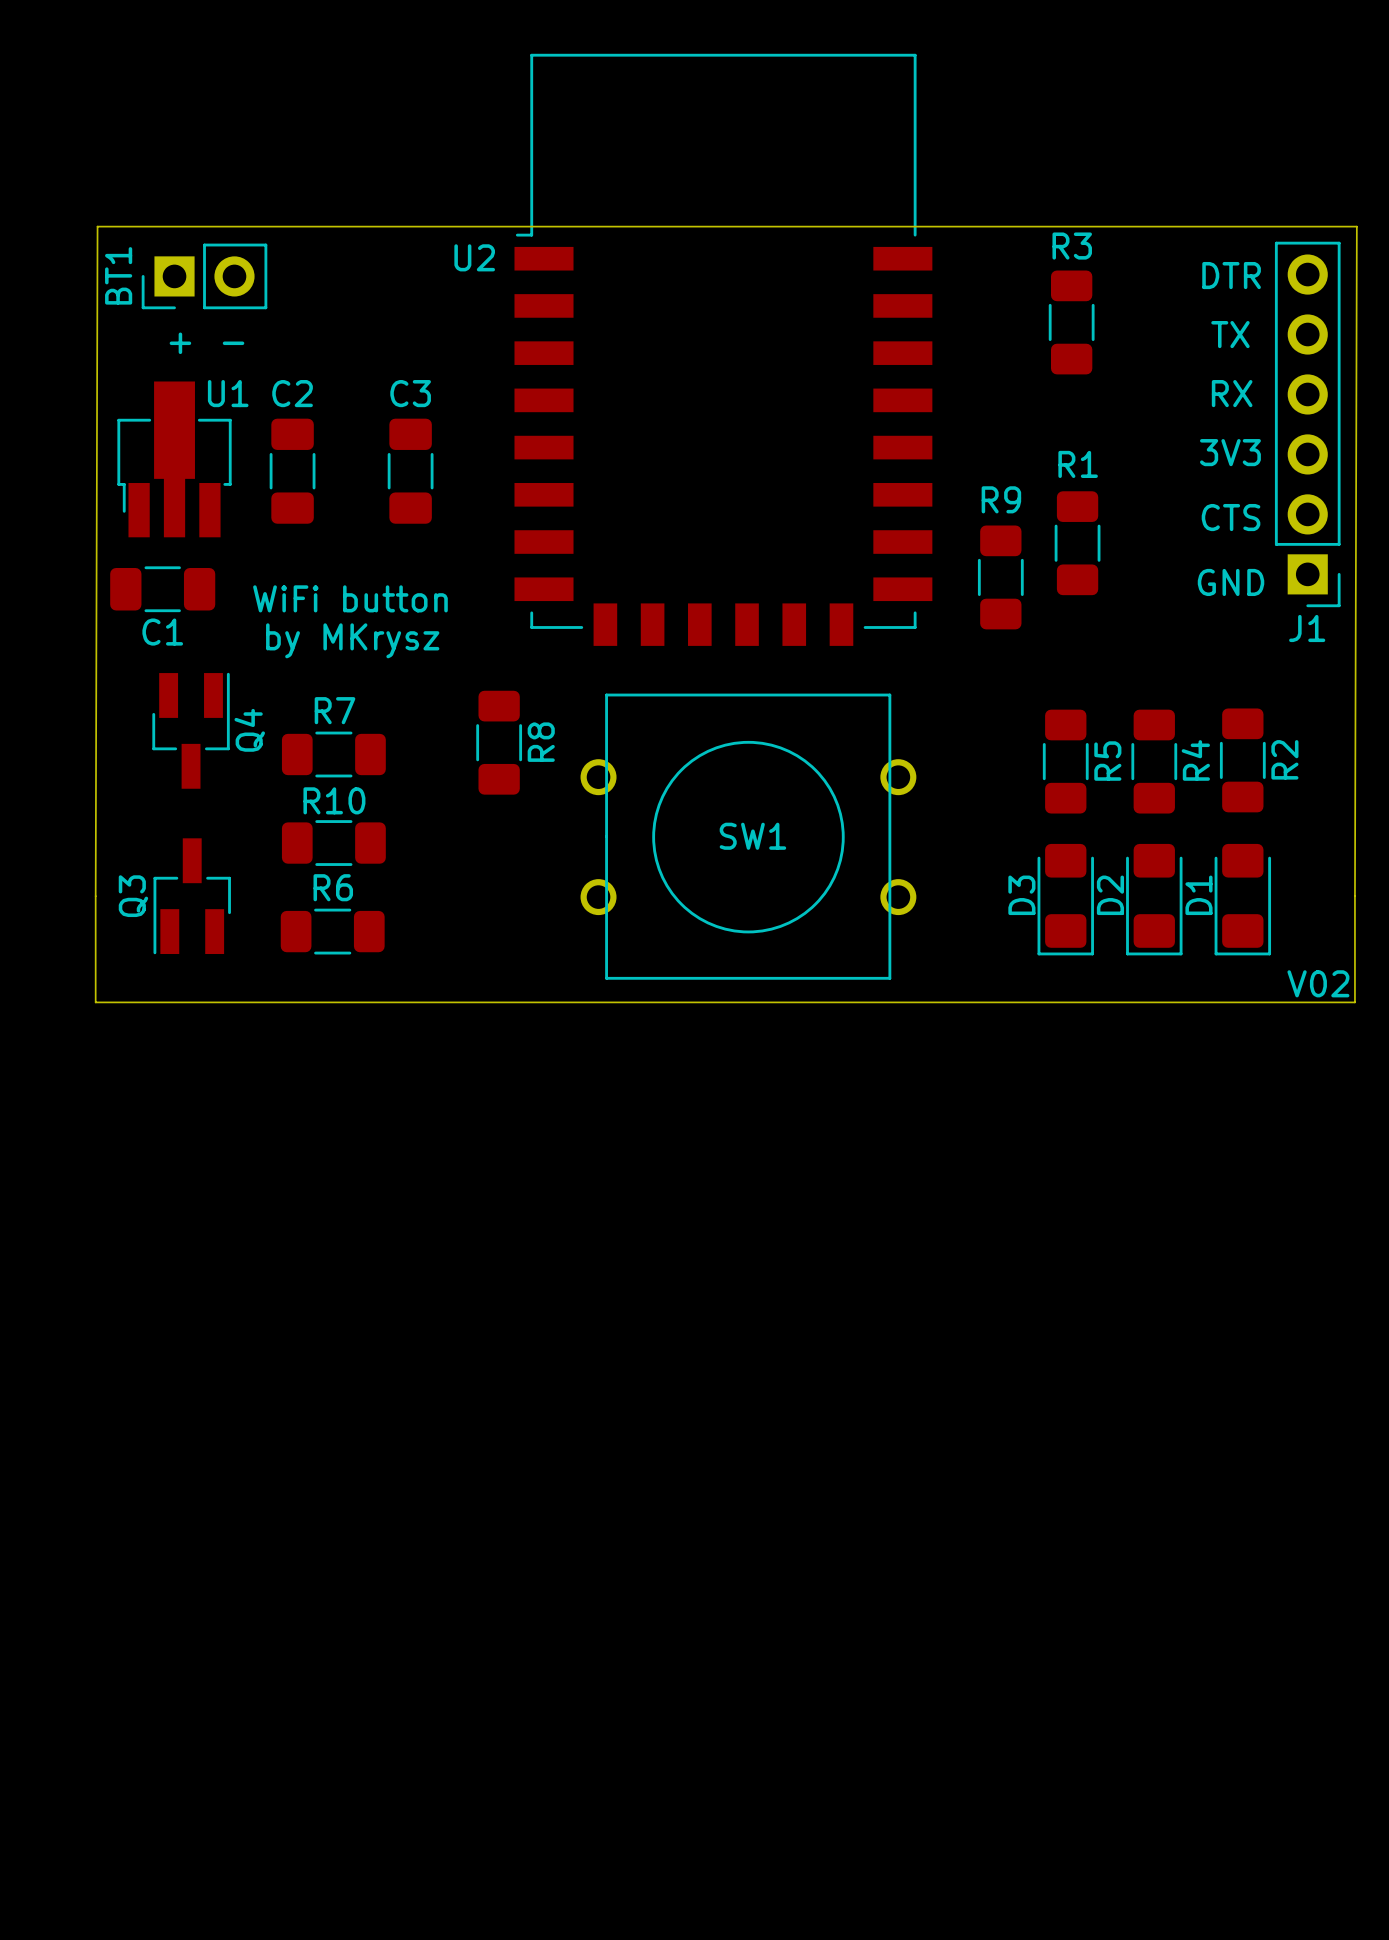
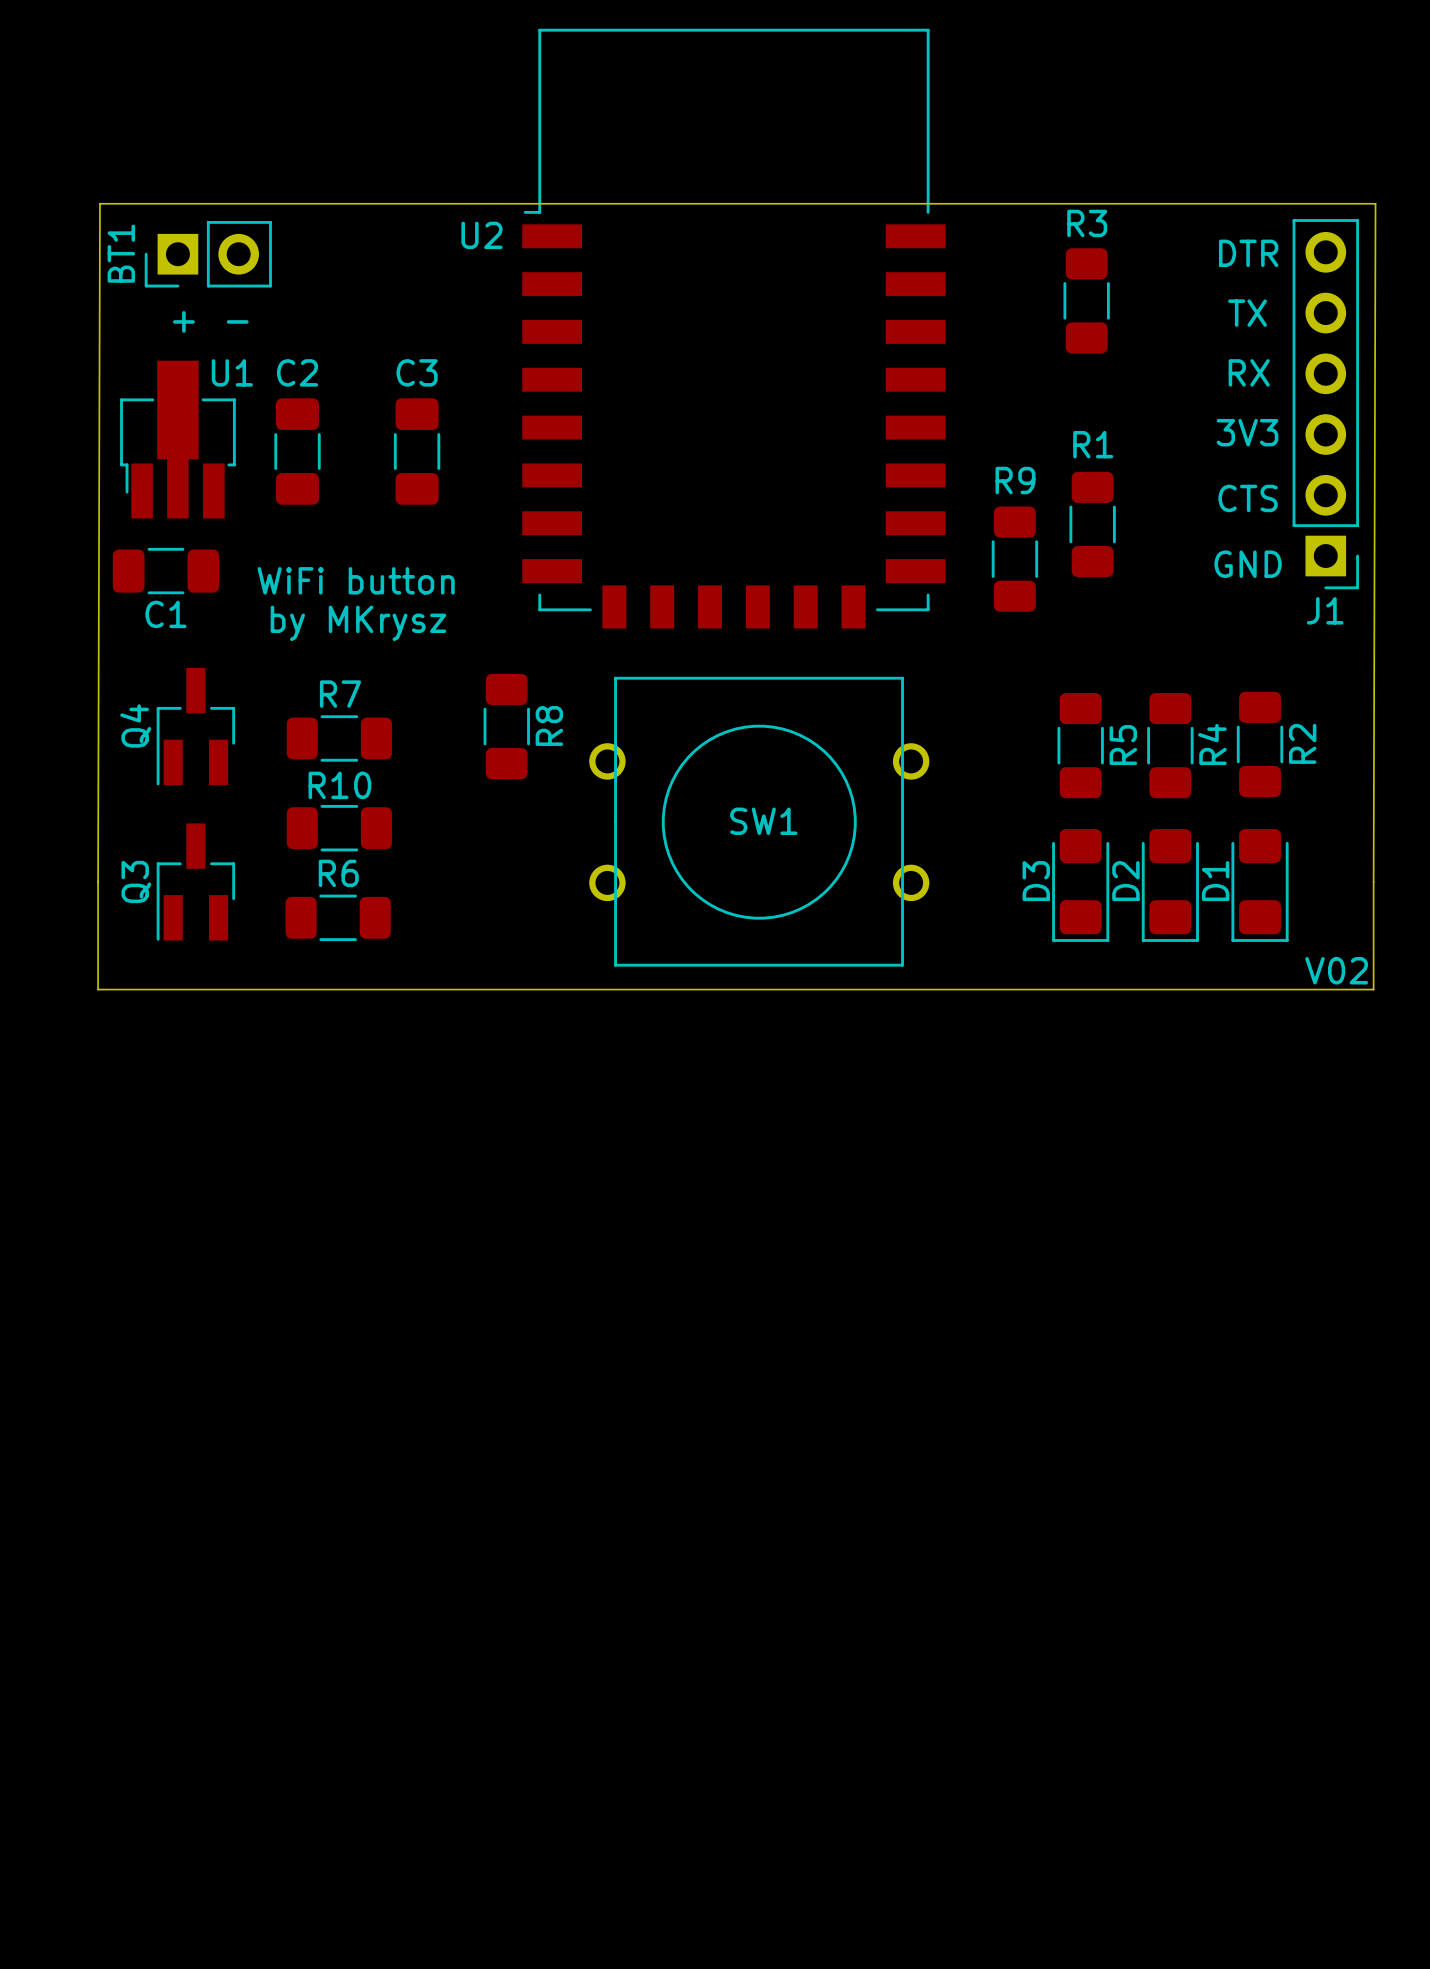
Q4 rotation: 0° (191, 730) -> 180° (195, 726)

